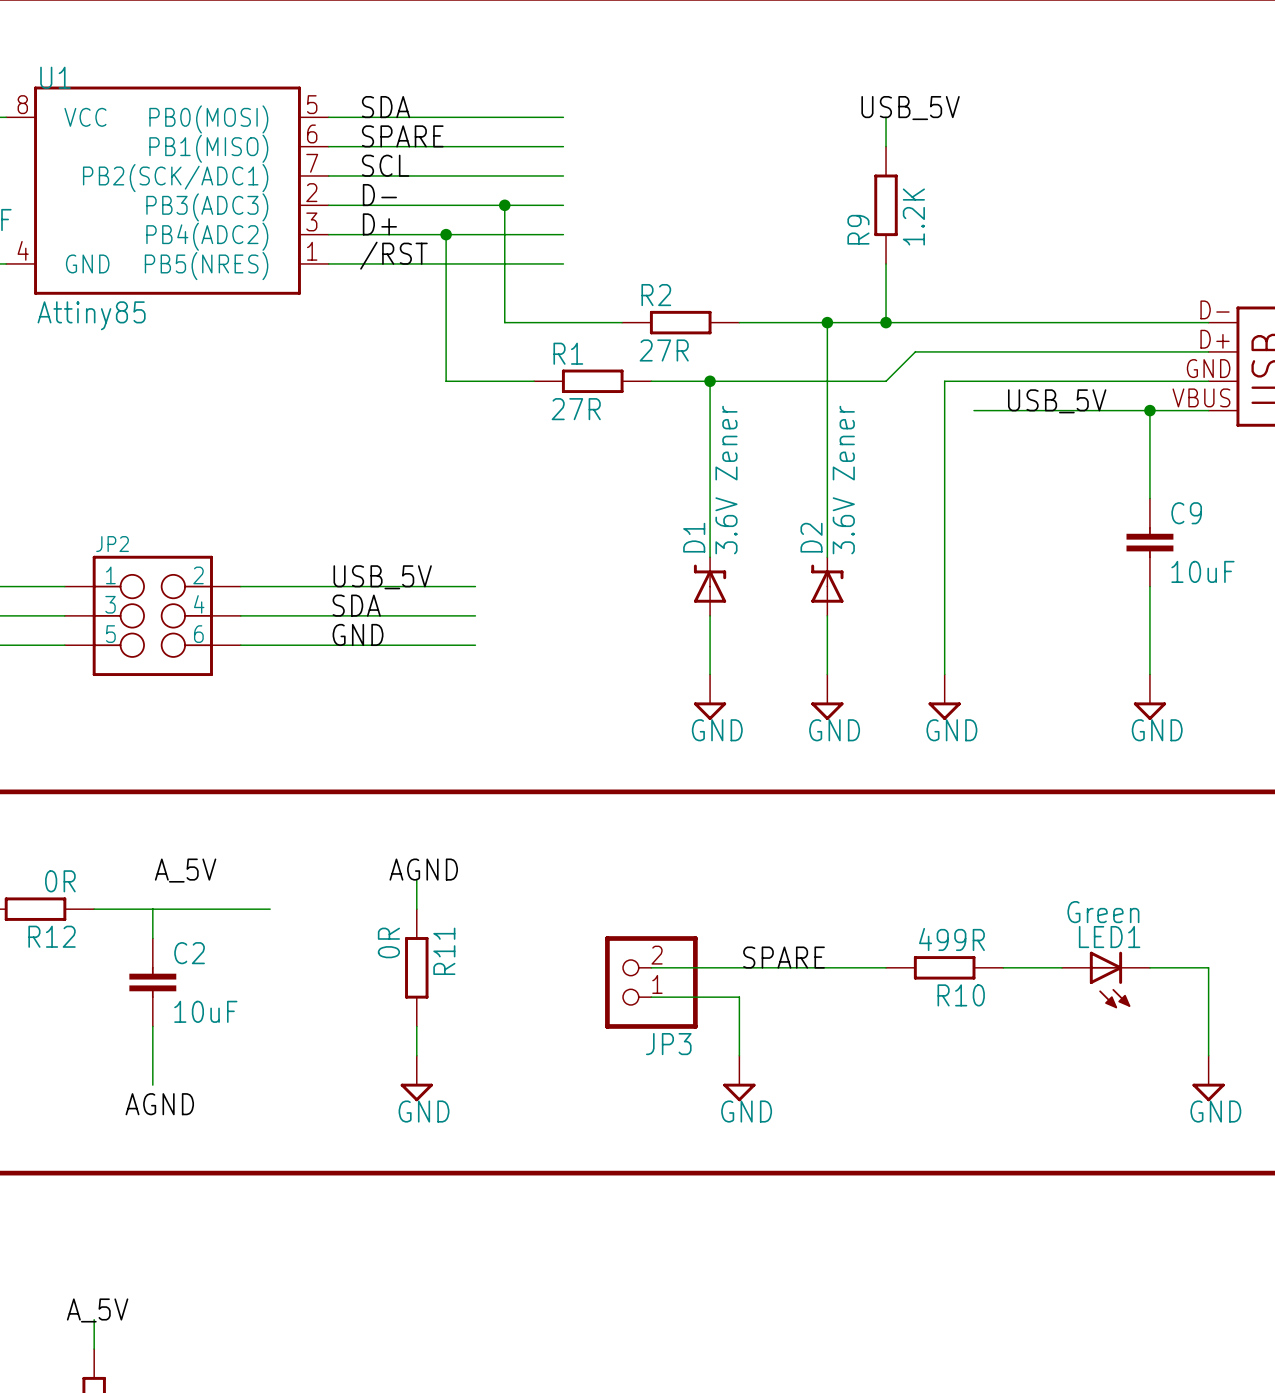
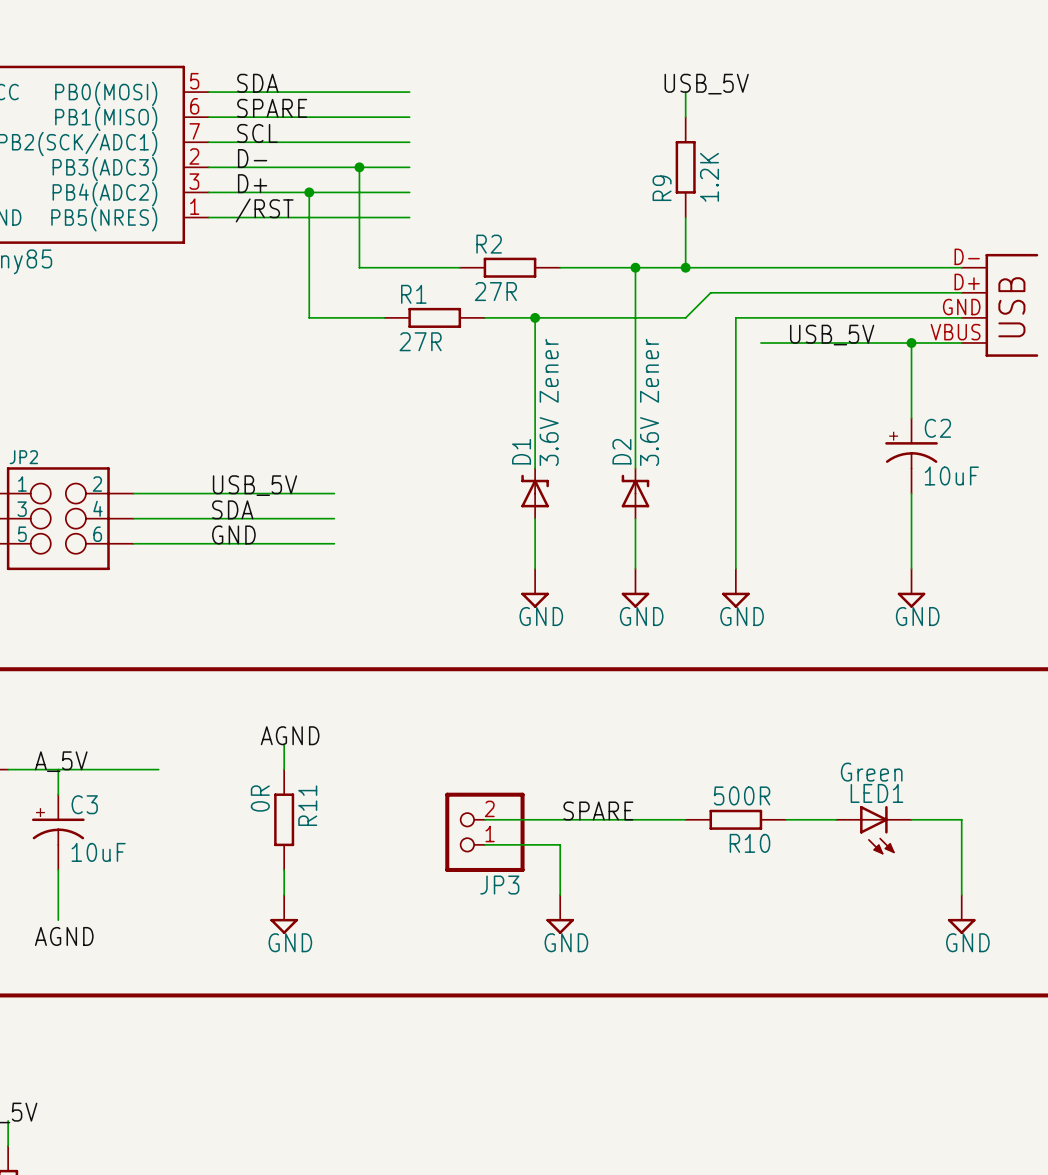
C9: 10uF (1149, 542) -> none
label position: A_5V (185, 870) -> A_5V (61, 761)
C2 symbol: [129, 938, 177, 1027] -> [885, 418, 938, 494]
R10 value: 499R (951, 939) -> 500R (742, 795)
C3: none -> 10uF (58, 832)

